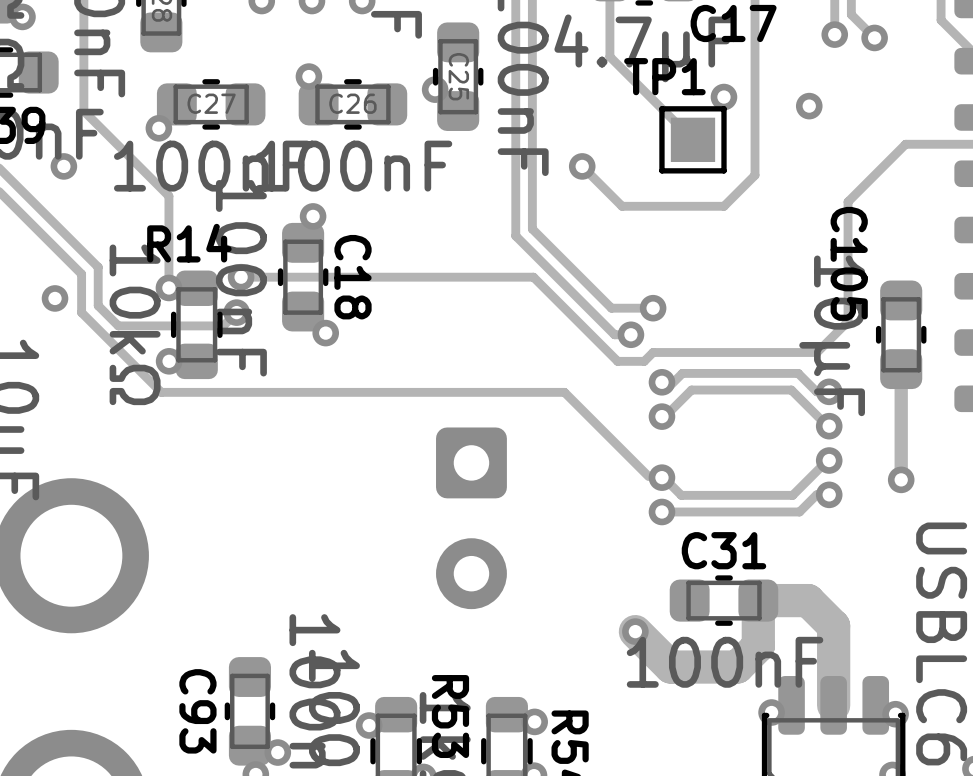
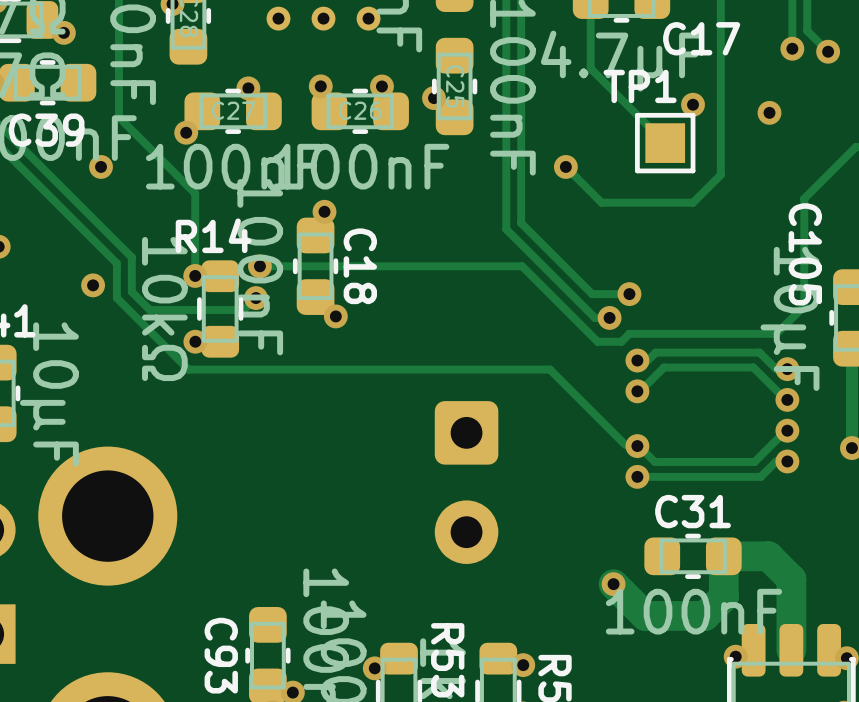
via: none -> (381, 86)
via: none -> (248, 88)

